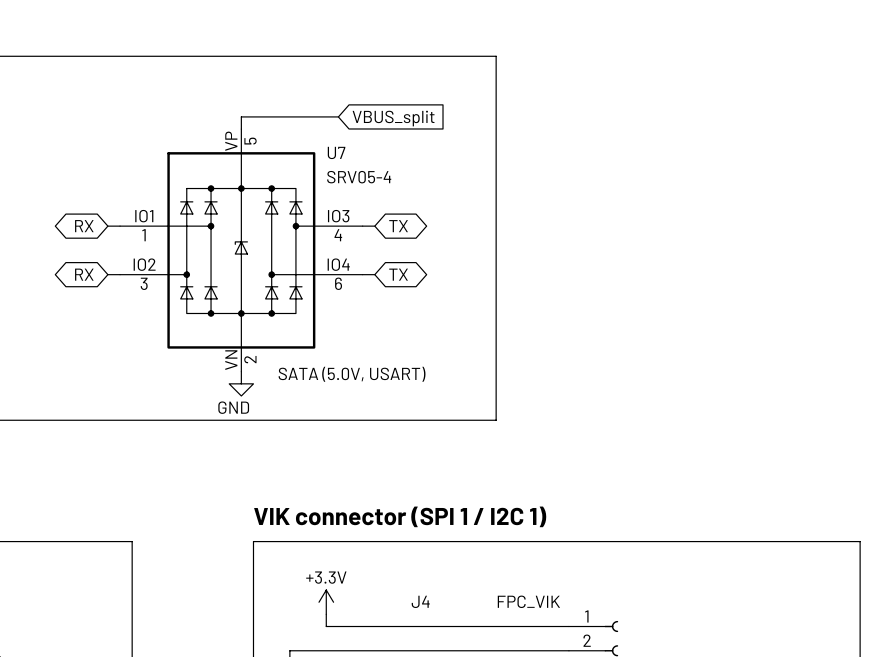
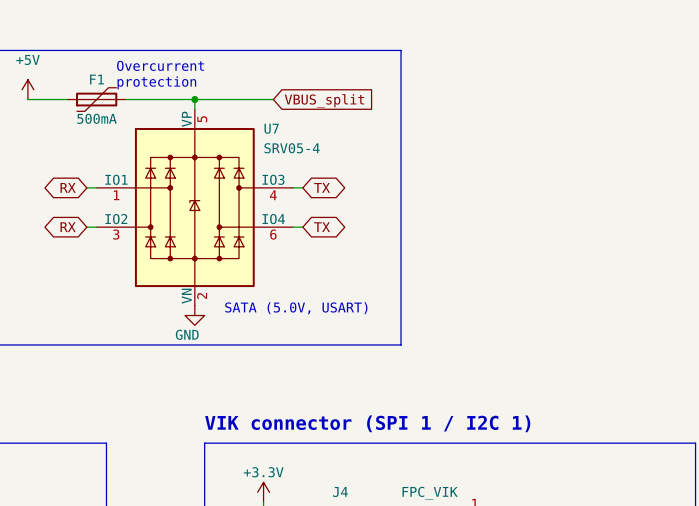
text: none -> Overcurrent (160, 65)
text: none -> protection (156, 82)
power symbol: none -> +5V (27, 89)
wire: none -> (27, 99) (67, 99)
F1: none -> 500mA (96, 99)
wire: none -> (126, 99) (194, 99)
junction: none -> (194, 99)

